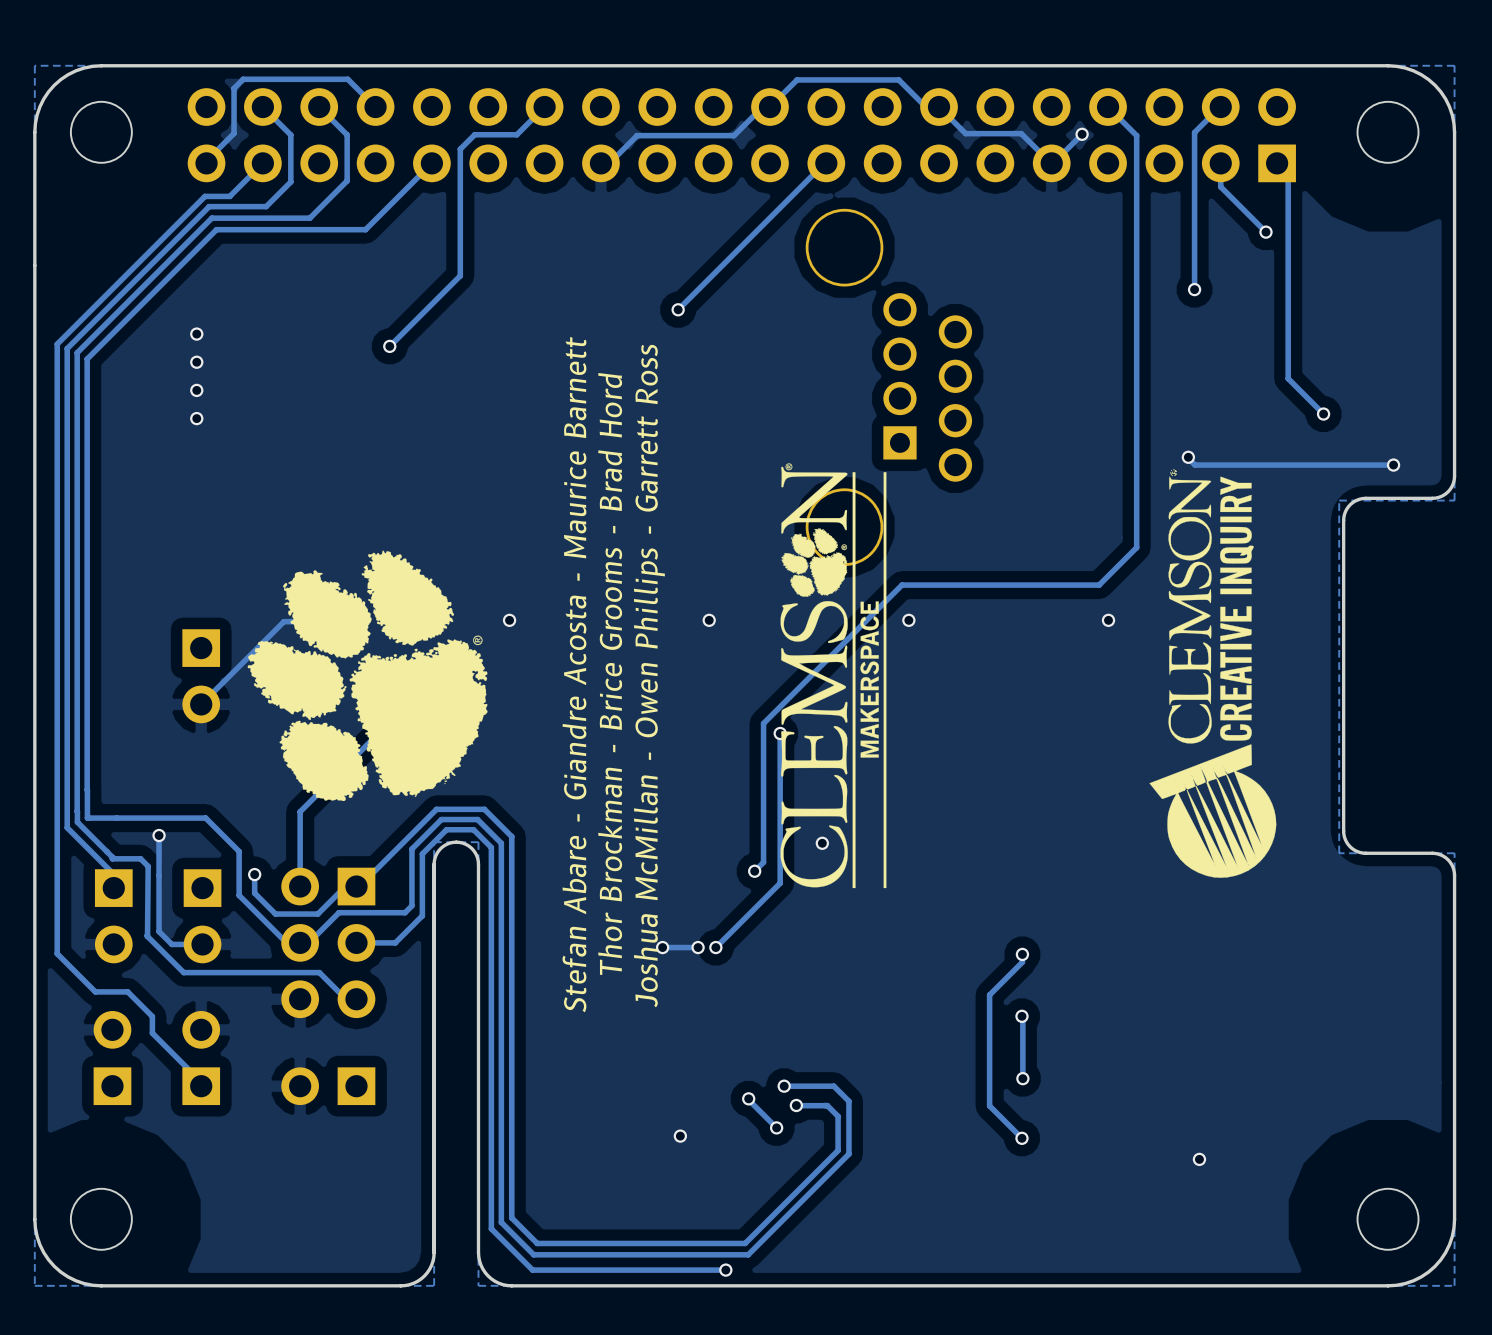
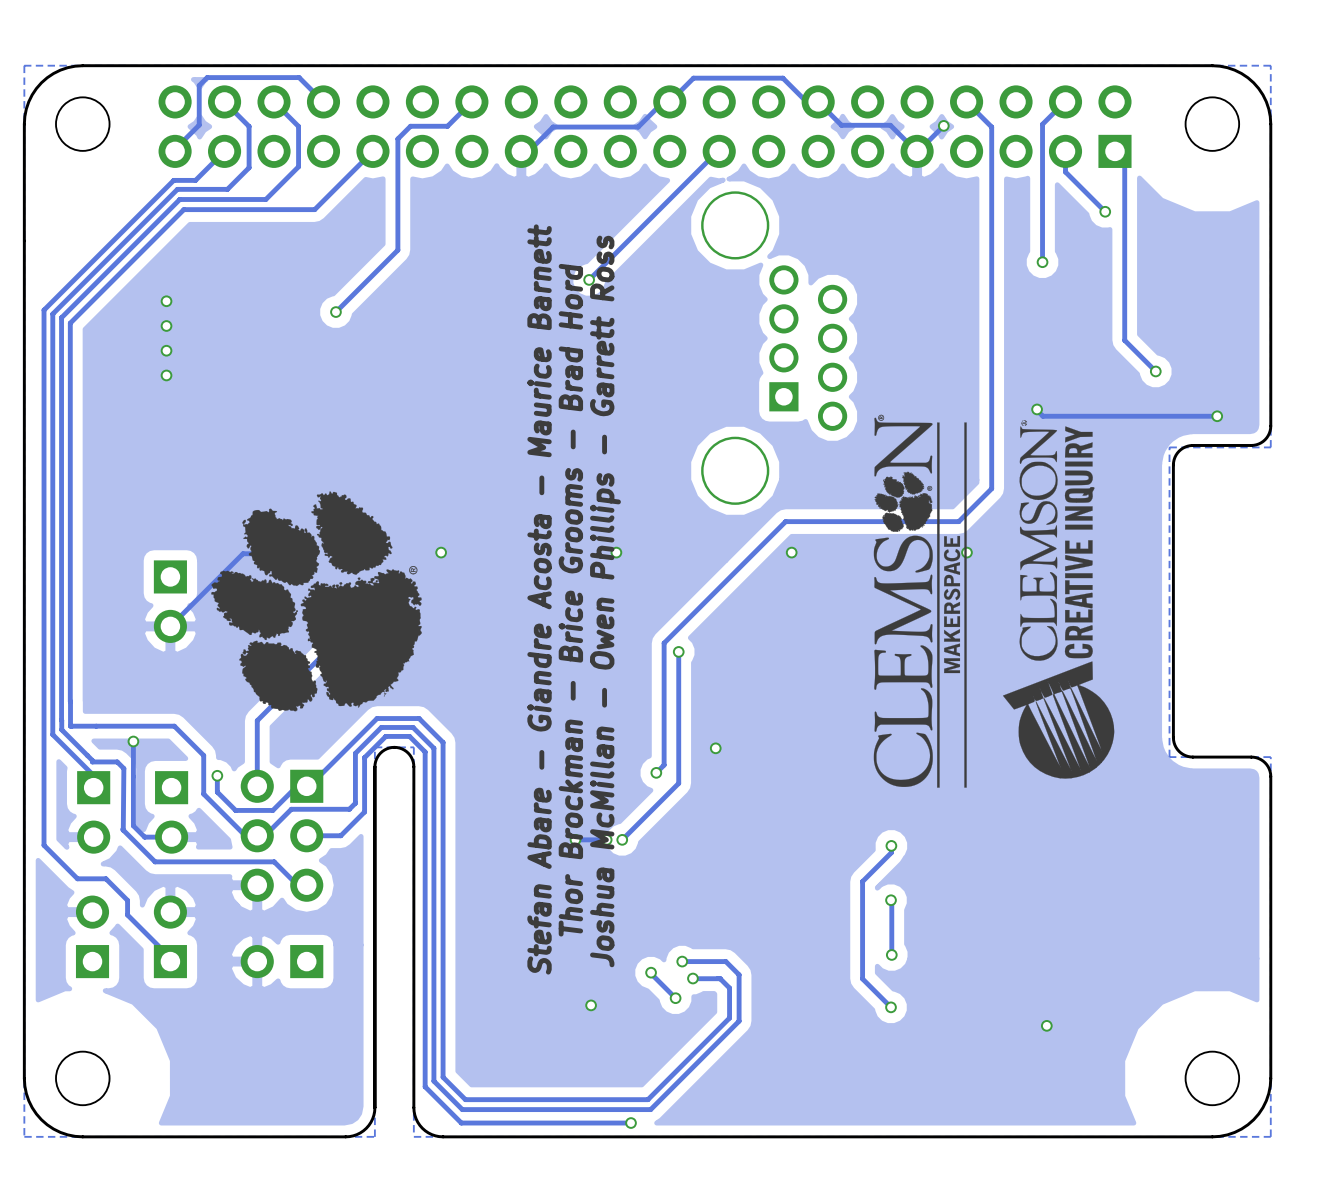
text: Stefan Abare - Giandre Acosta - Maurice Barnett (574, 674) -> none
text: Thor Brockman - Brice Grooms - Brad Hord (610, 674) -> Stefan Abare - Giandre Acosta - Maurice Barnett (539, 599)
drawing position: (833, 675) -> (920, 601)
text: Joshua McMillan - Owen Phillips - Garrett Ross (649, 676) -> Thor Brockman - Brice Grooms - Brad Hord (570, 600)
text: none -> Joshua McMillan - Owen Phillips - Garrett Ross (605, 601)

